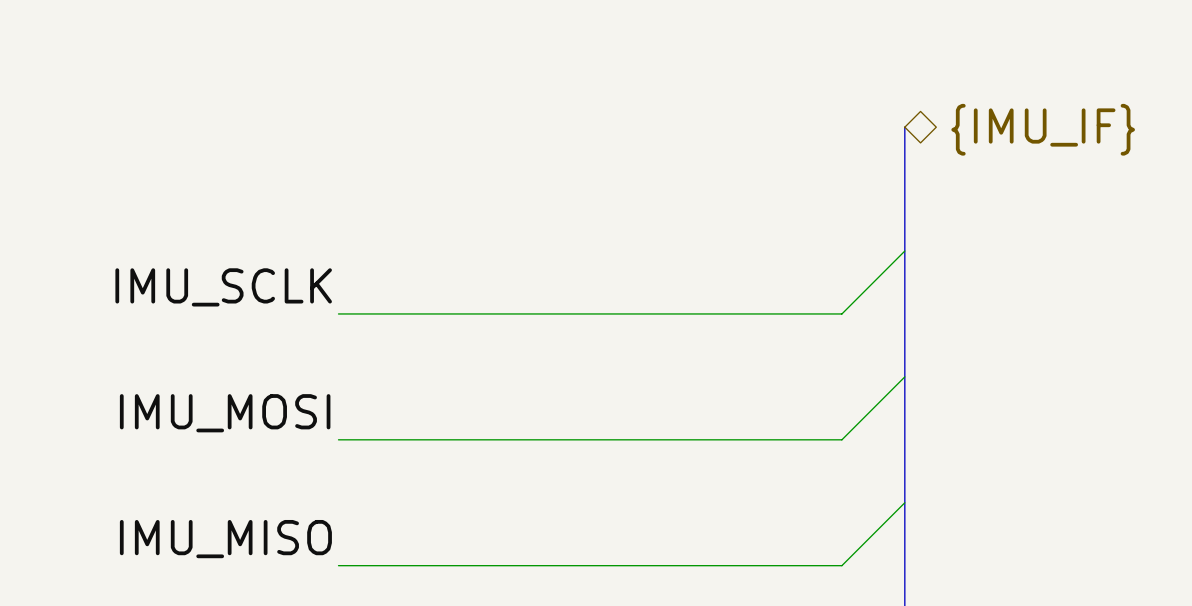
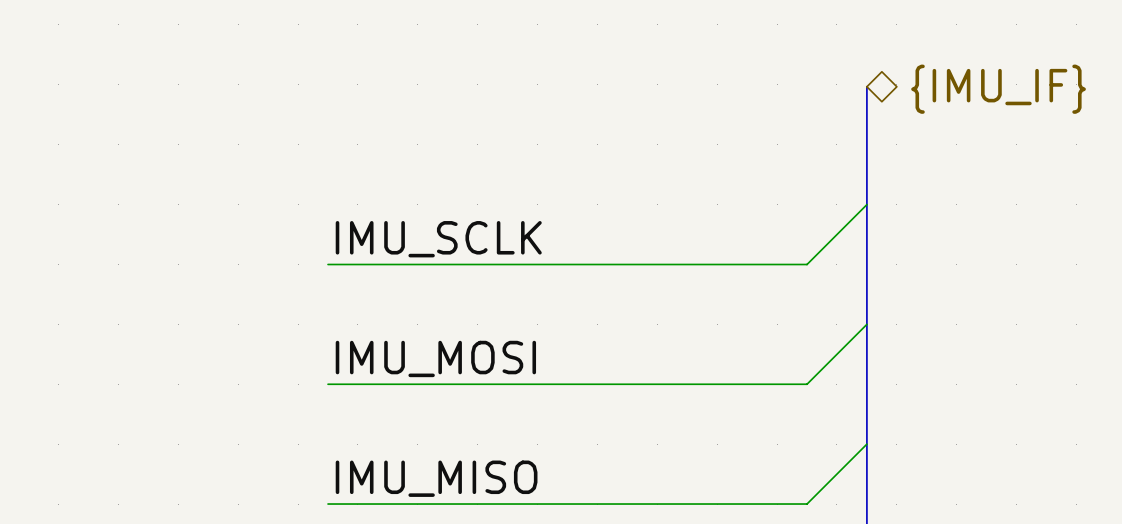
label position: IMU_SCLK (223, 287) -> IMU_SCLK (438, 239)
label position: IMU_MOSI (225, 413) -> IMU_MOSI (435, 358)
label position: IMU_MISO (225, 539) -> IMU_MISO (436, 478)

